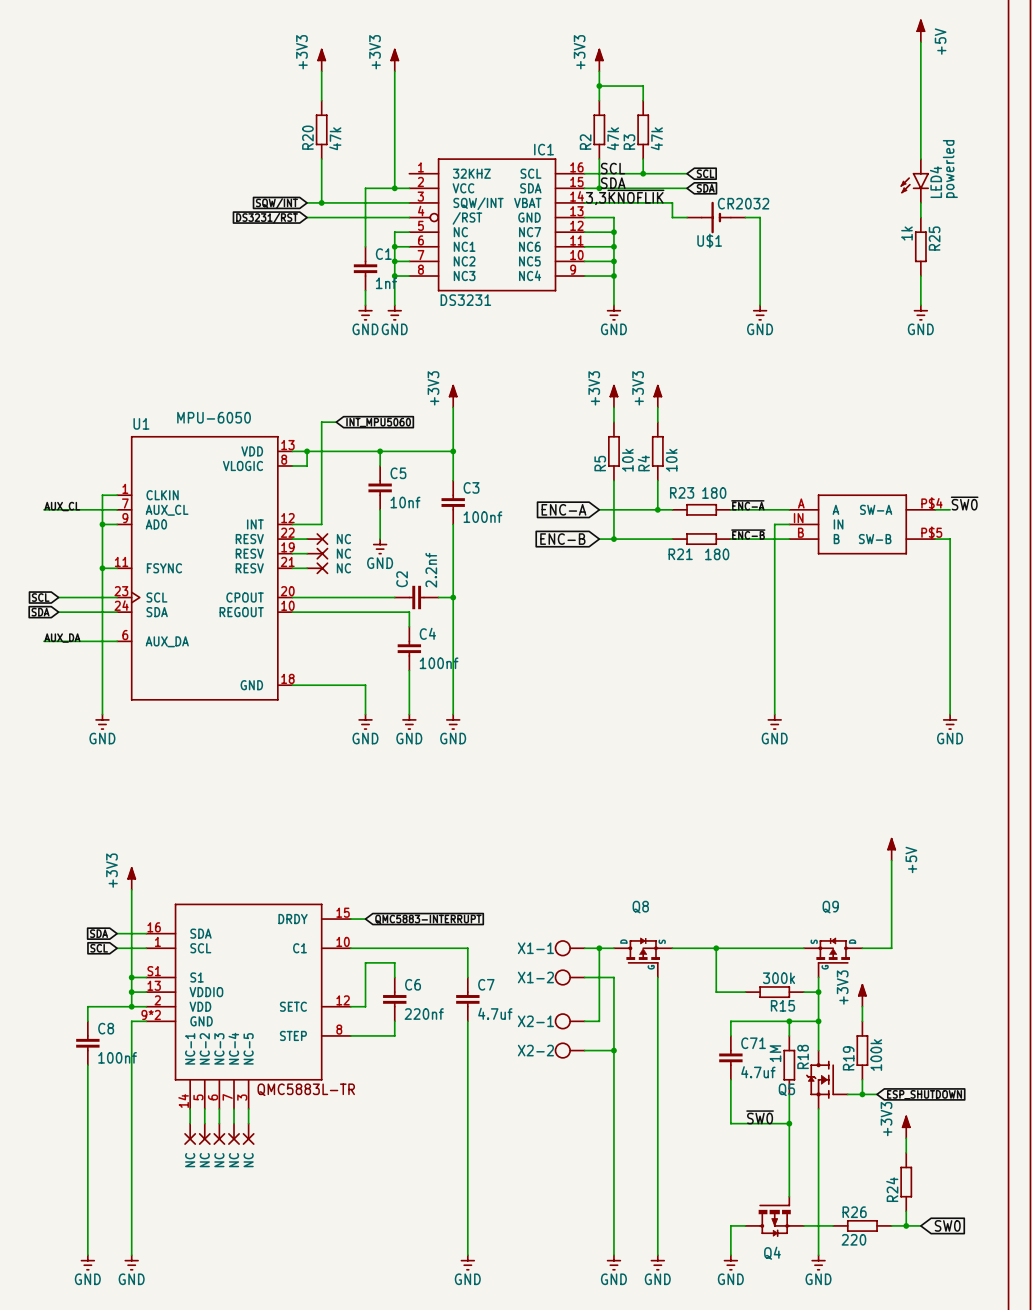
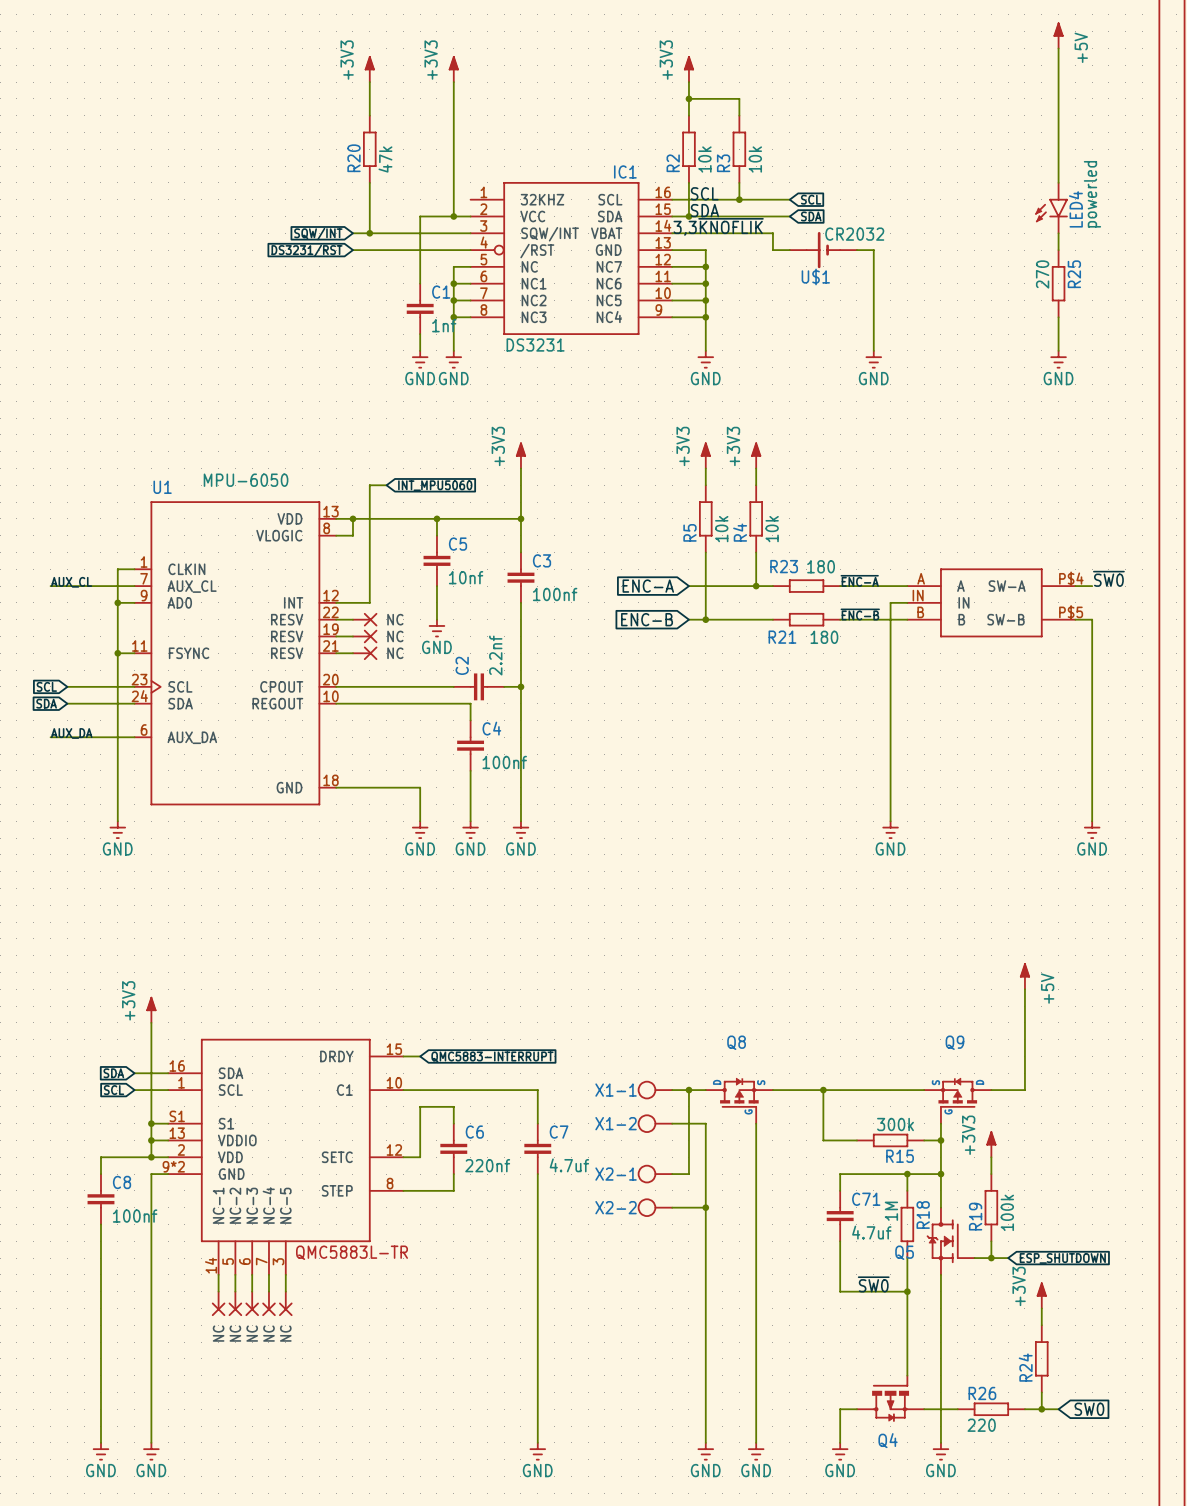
R2 value: 47k (612, 138) -> 10k (704, 159)
R3 value: 47k (656, 138) -> 10k (755, 159)
R25 value: 1k (906, 233) -> 270 (1042, 274)

